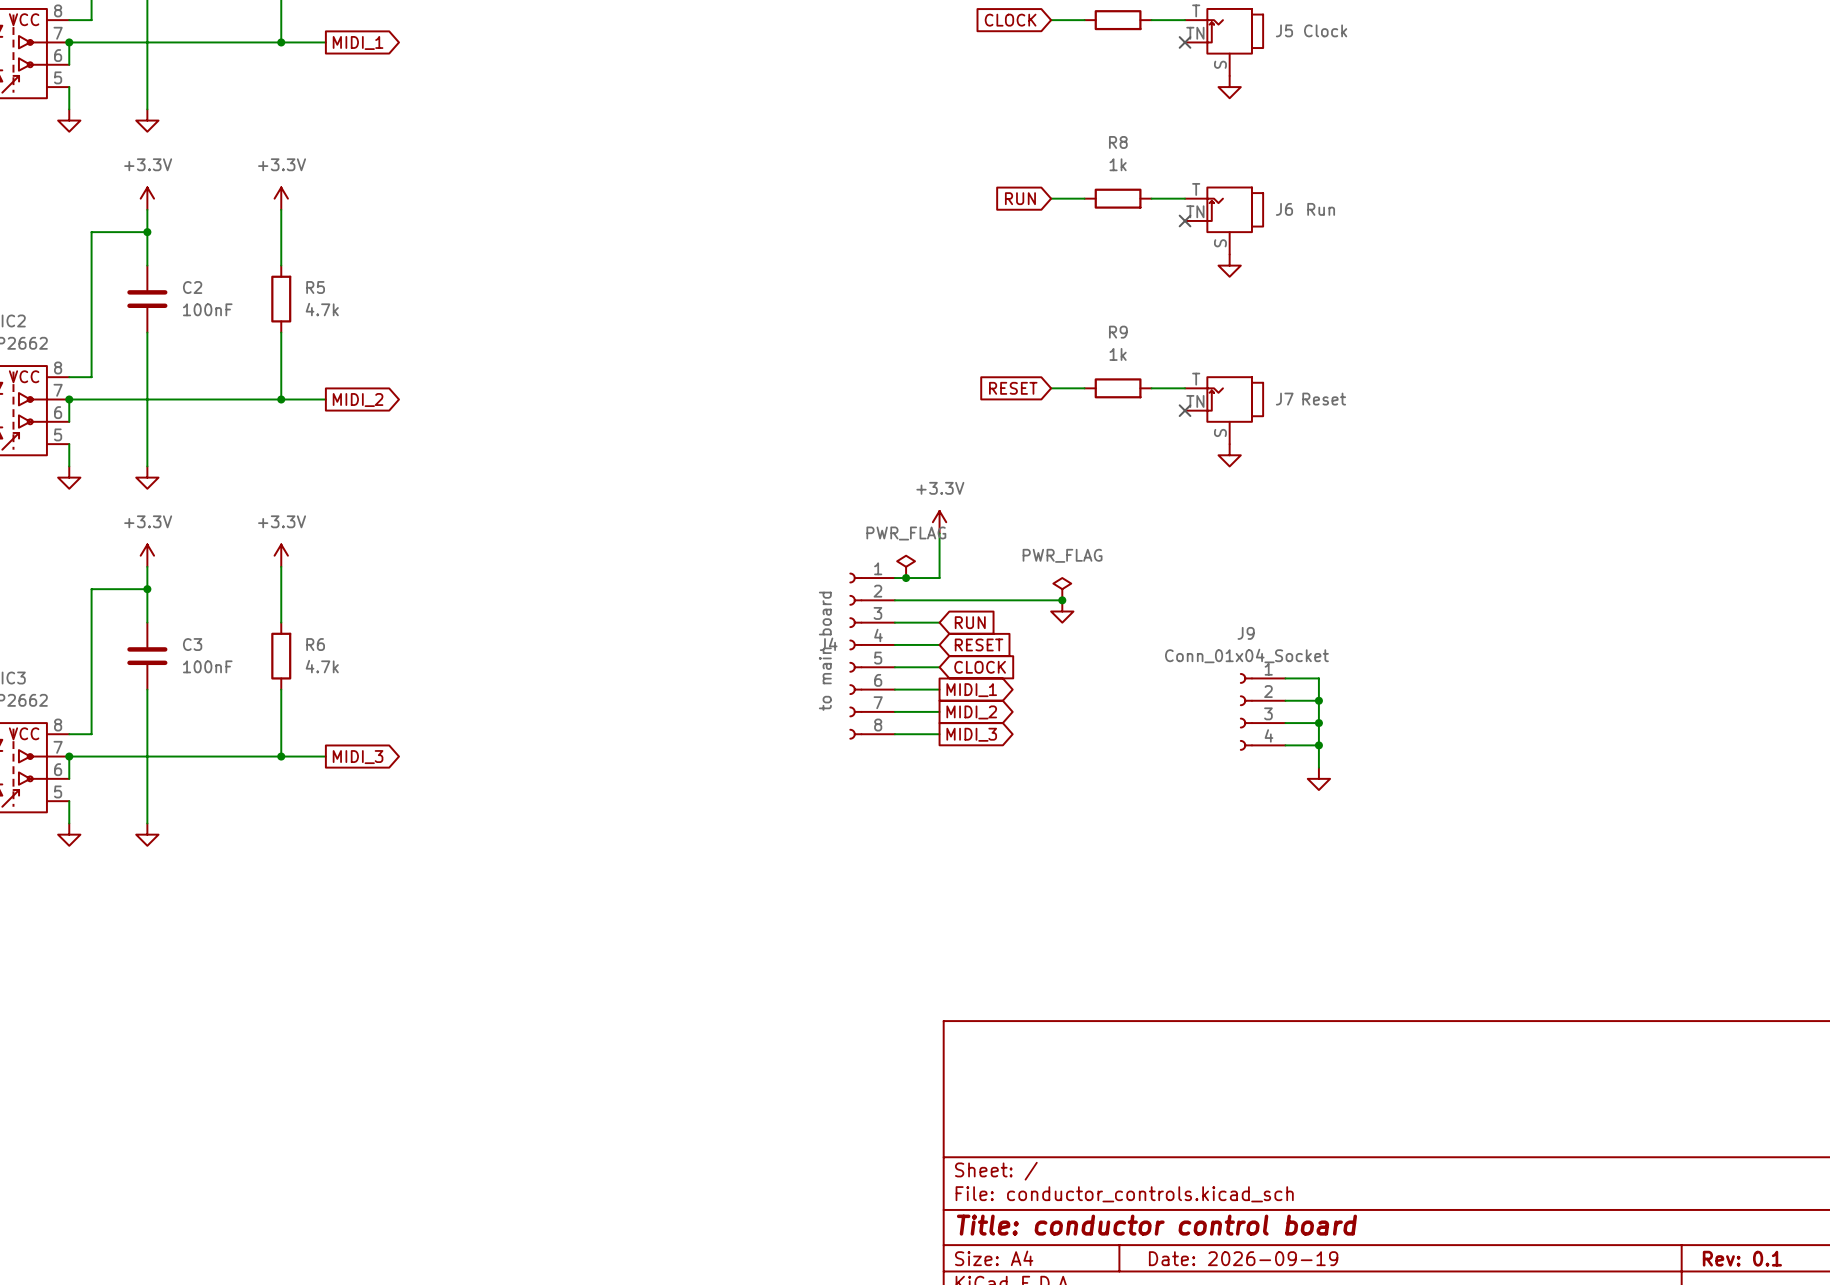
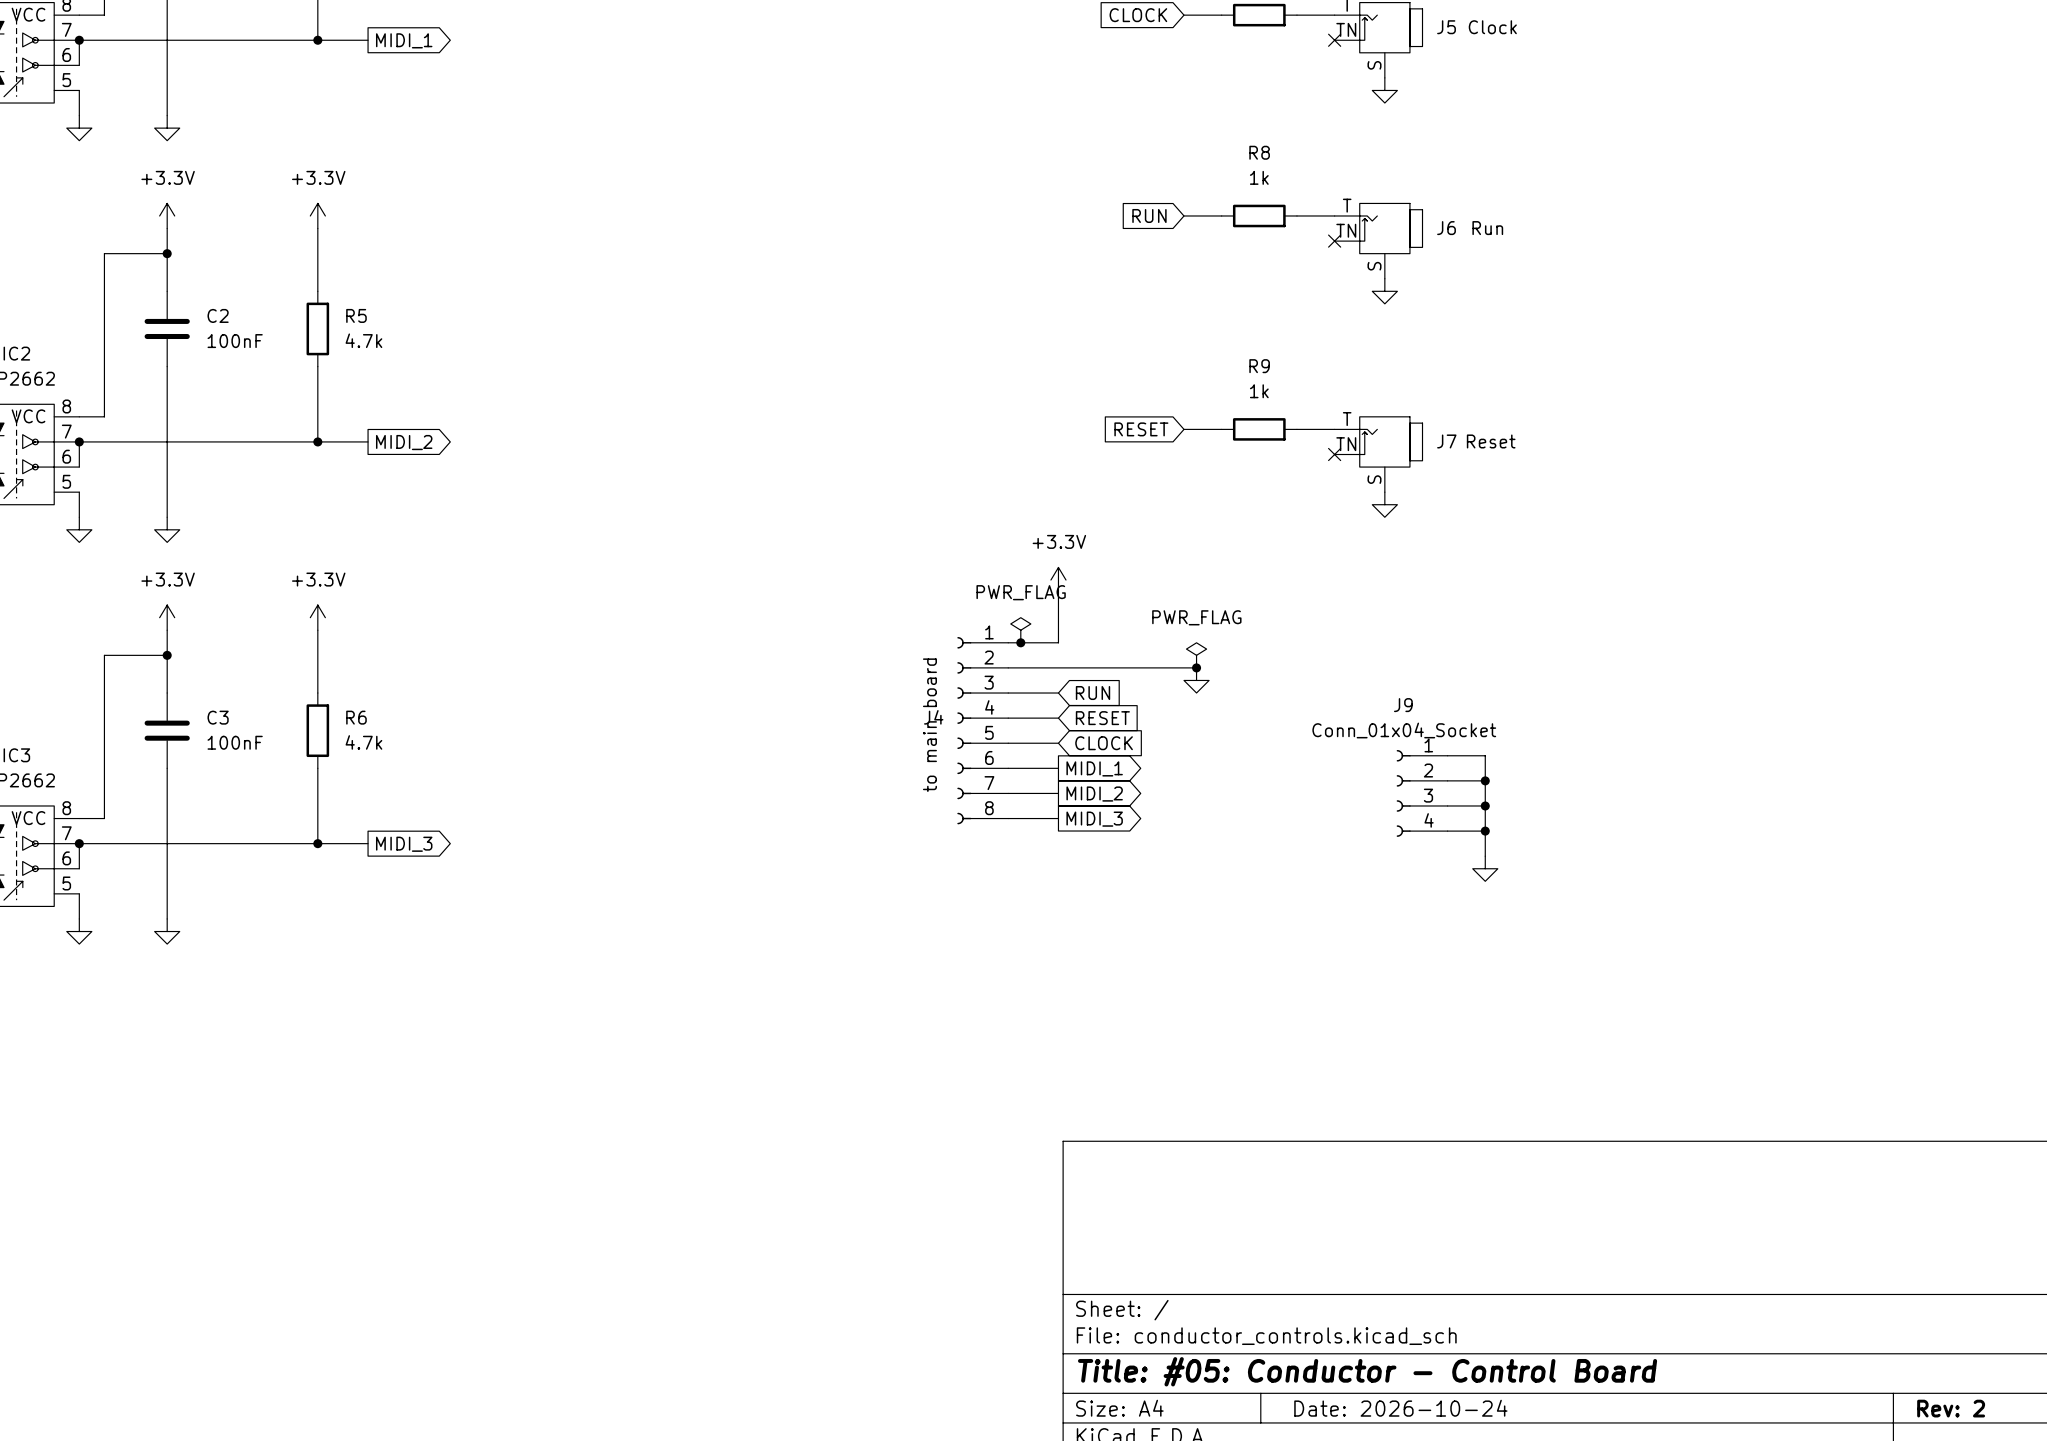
title block: Title: conductor control board (1156, 1225) -> Title: #05: Conductor - Control Board (1367, 1371)
title block: Date: 2026-09-19 (1243, 1258) -> Date: 2026-10-24 (1400, 1408)
title block: Rev: 0.1 (1742, 1258) -> Rev: 2 (1951, 1408)

